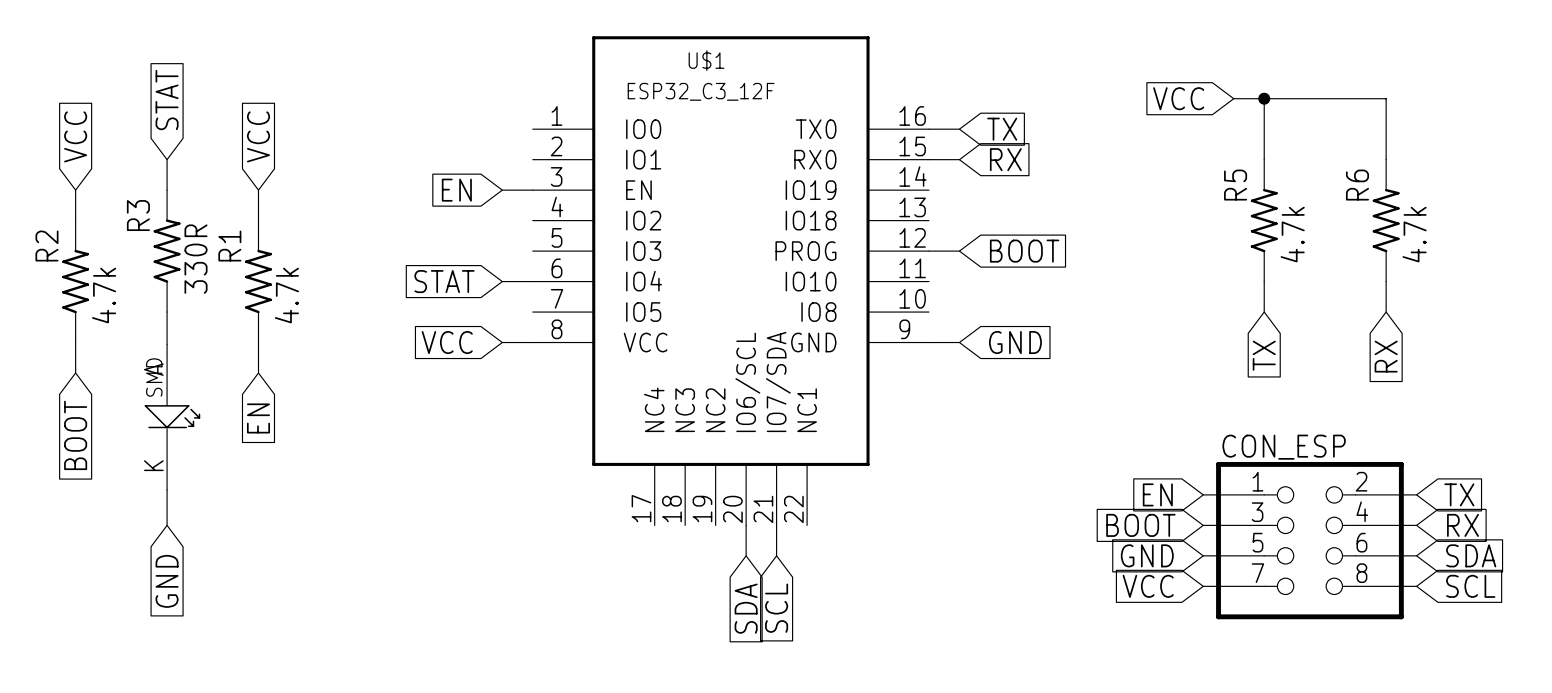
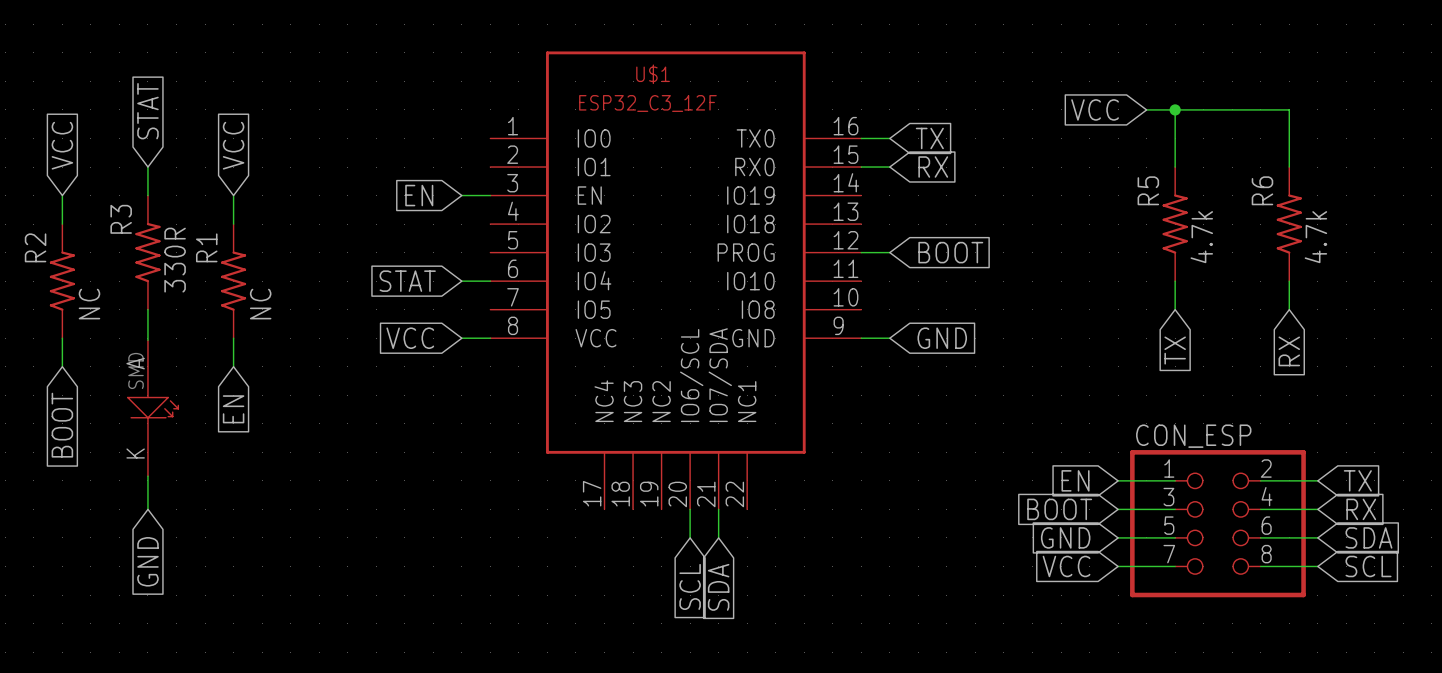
R2 value: 4.7k (104, 295) -> NC (89, 304)
R1 value: 4.7k (286, 295) -> NC (260, 304)
global label: SDA (746, 608) -> SCL (690, 586)
global label: SCL (776, 608) -> SDA (718, 587)

